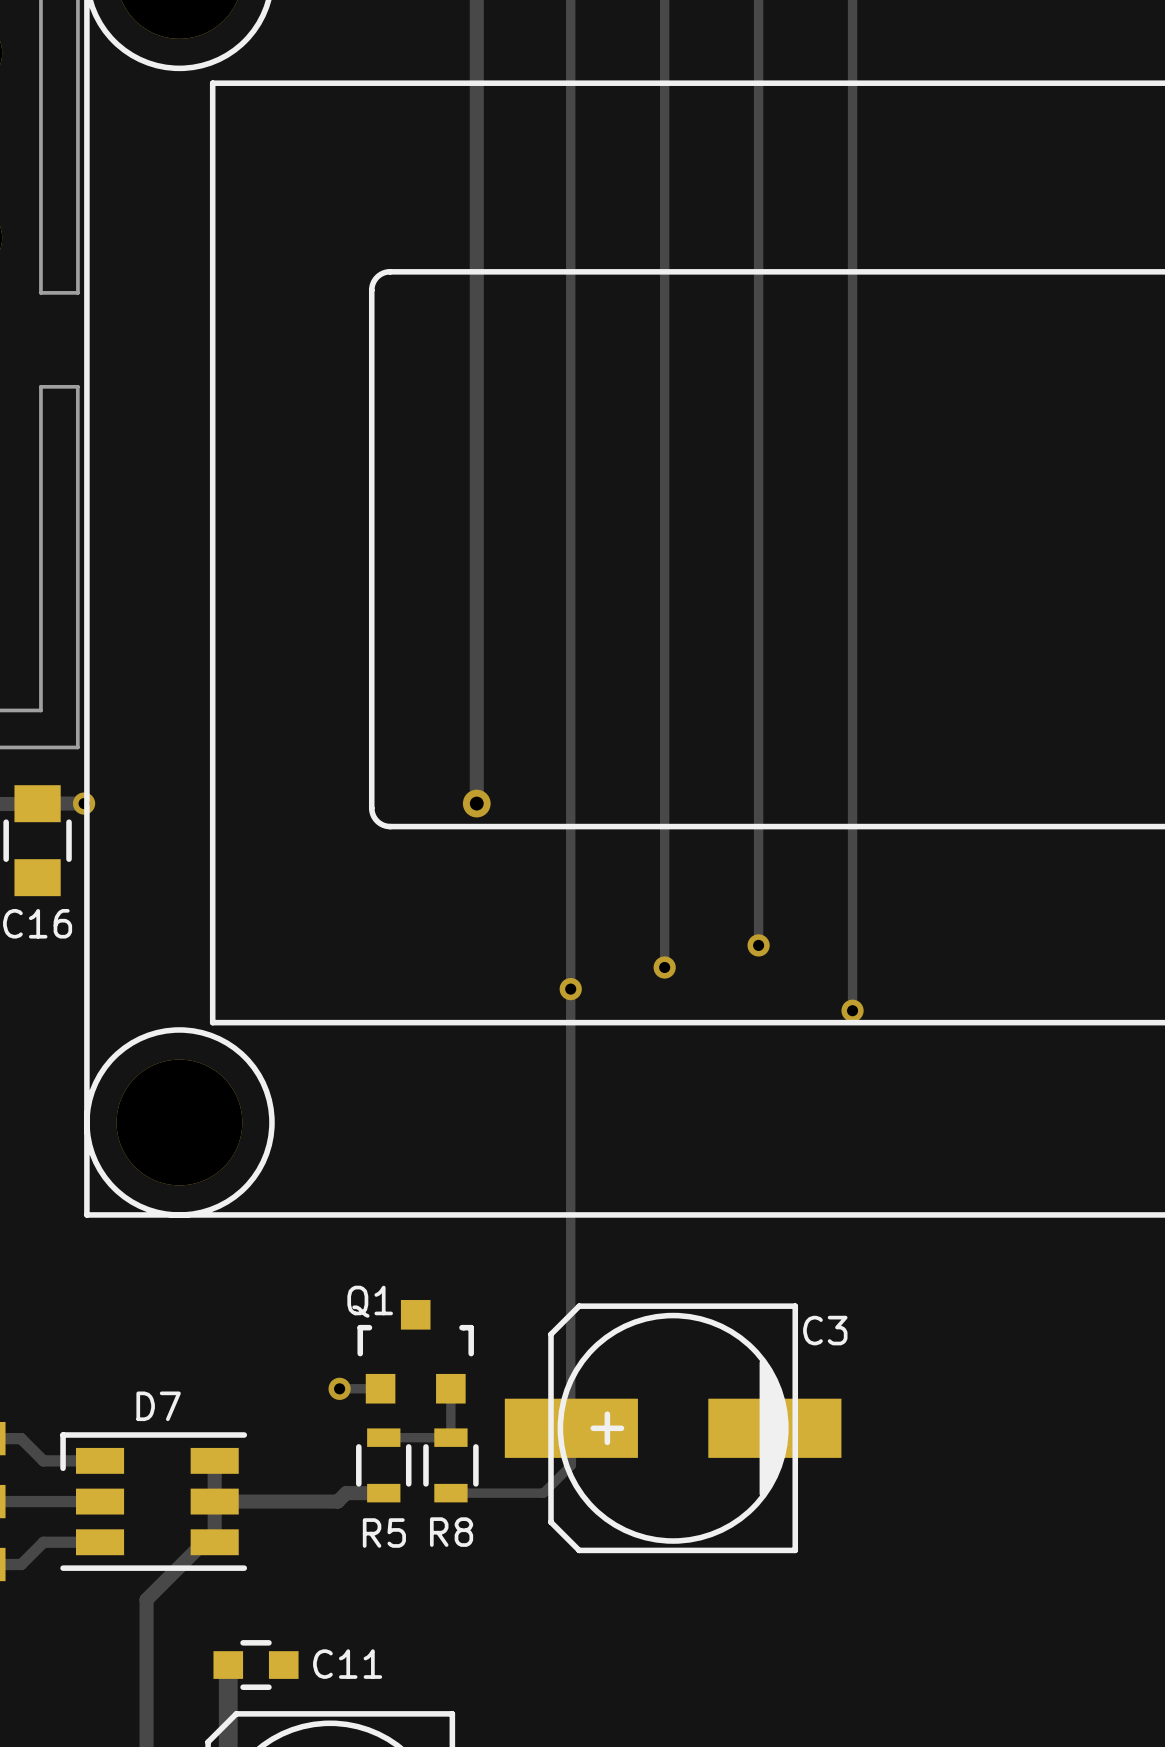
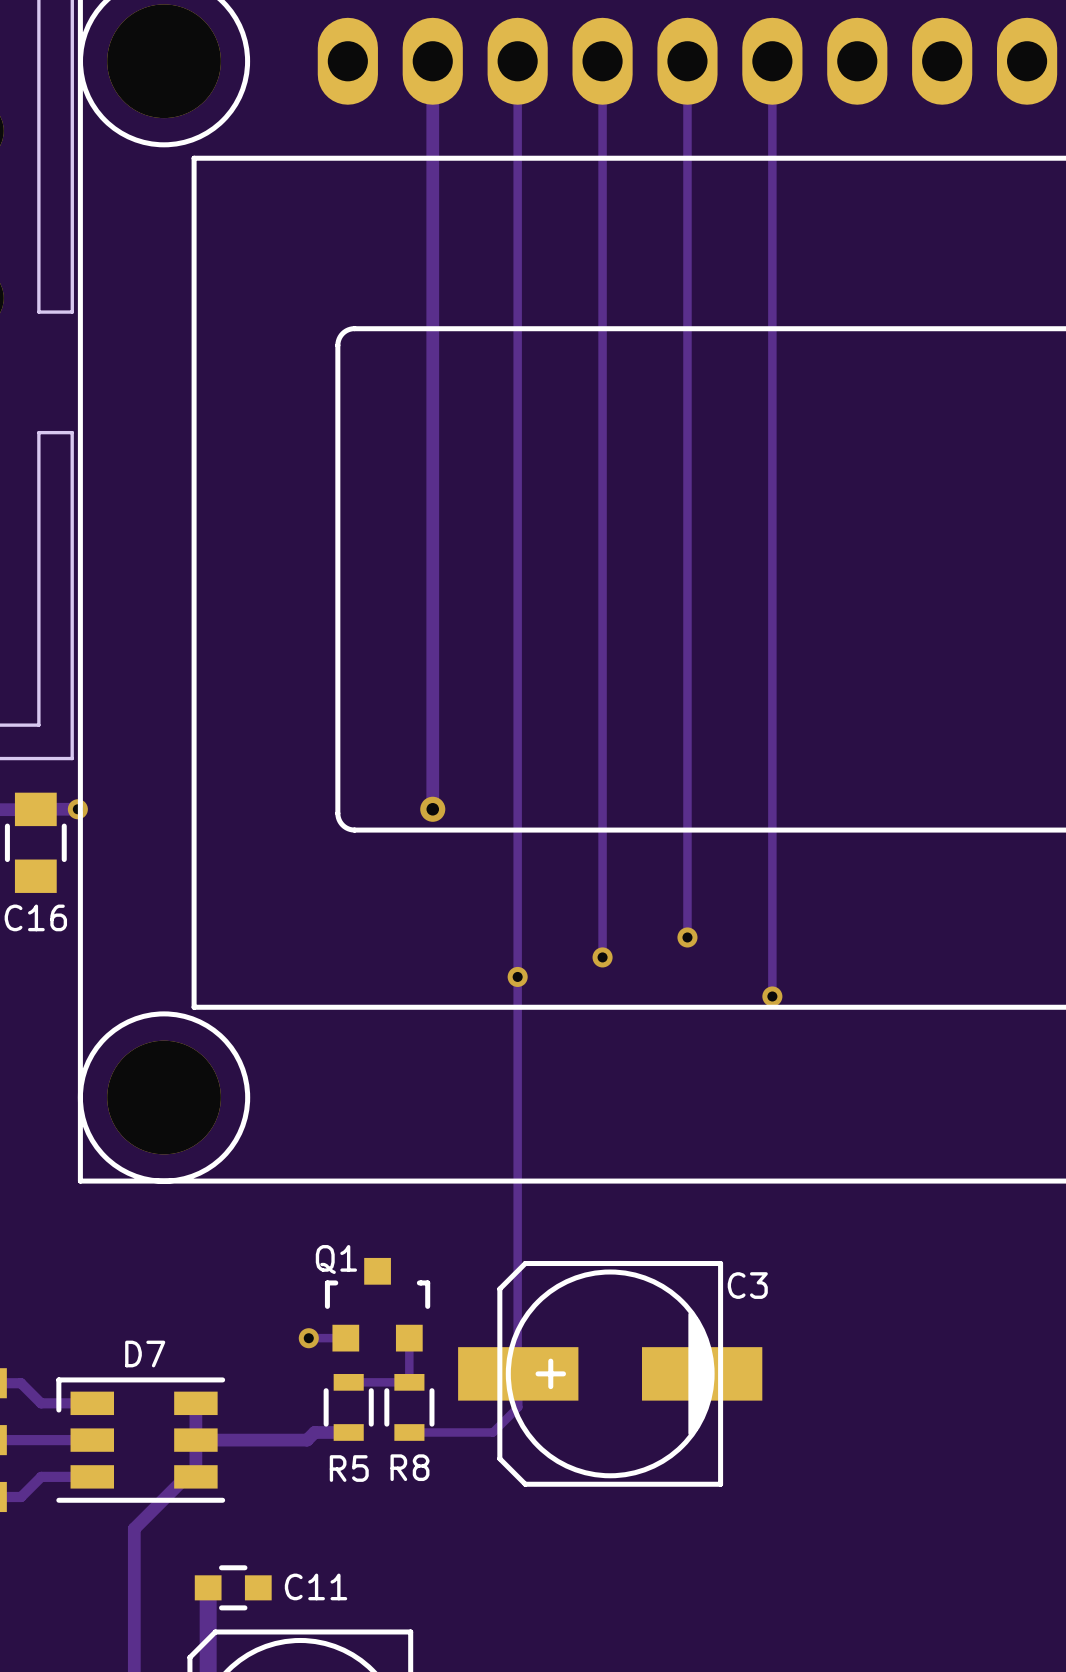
board edge: (40, 253) (40, 292) (77, 292) (77, 253) -> (38, 312) (72, 312)

